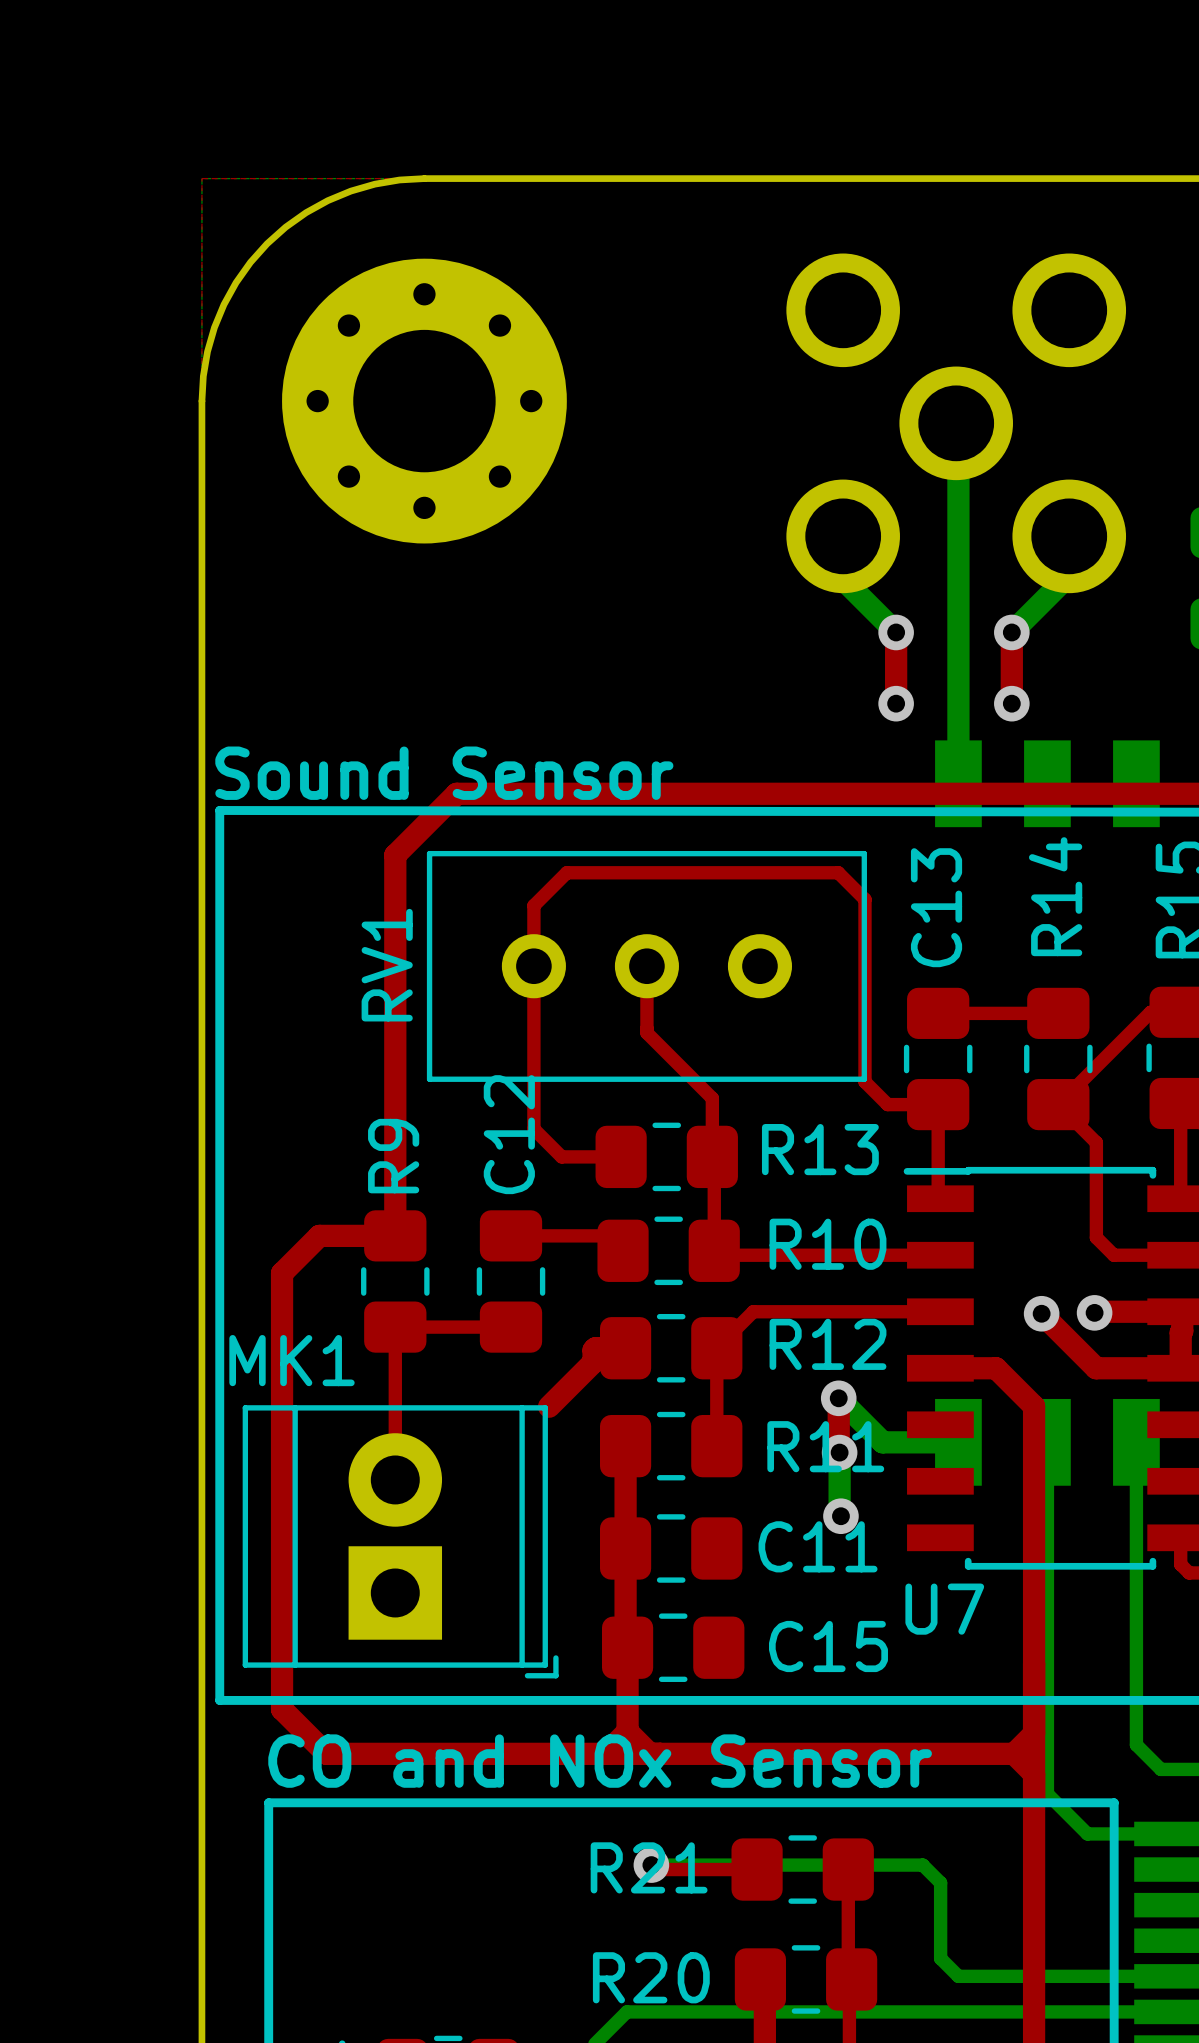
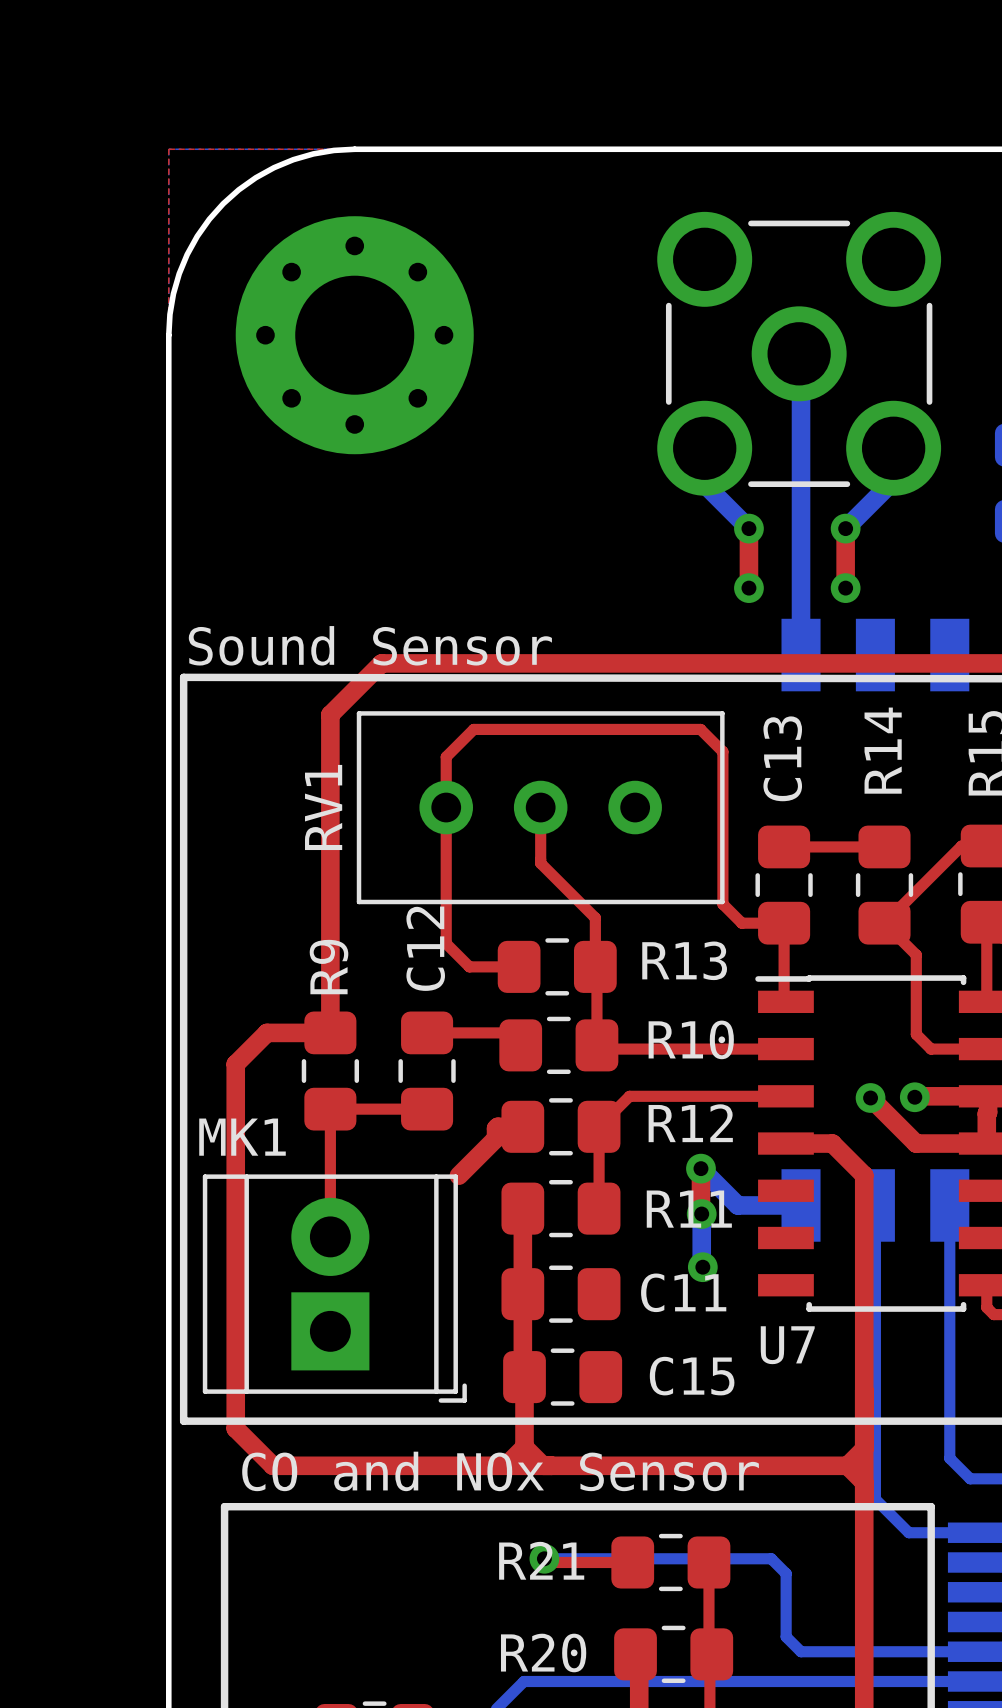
part side: bottom (956, 423) -> top (799, 353)

